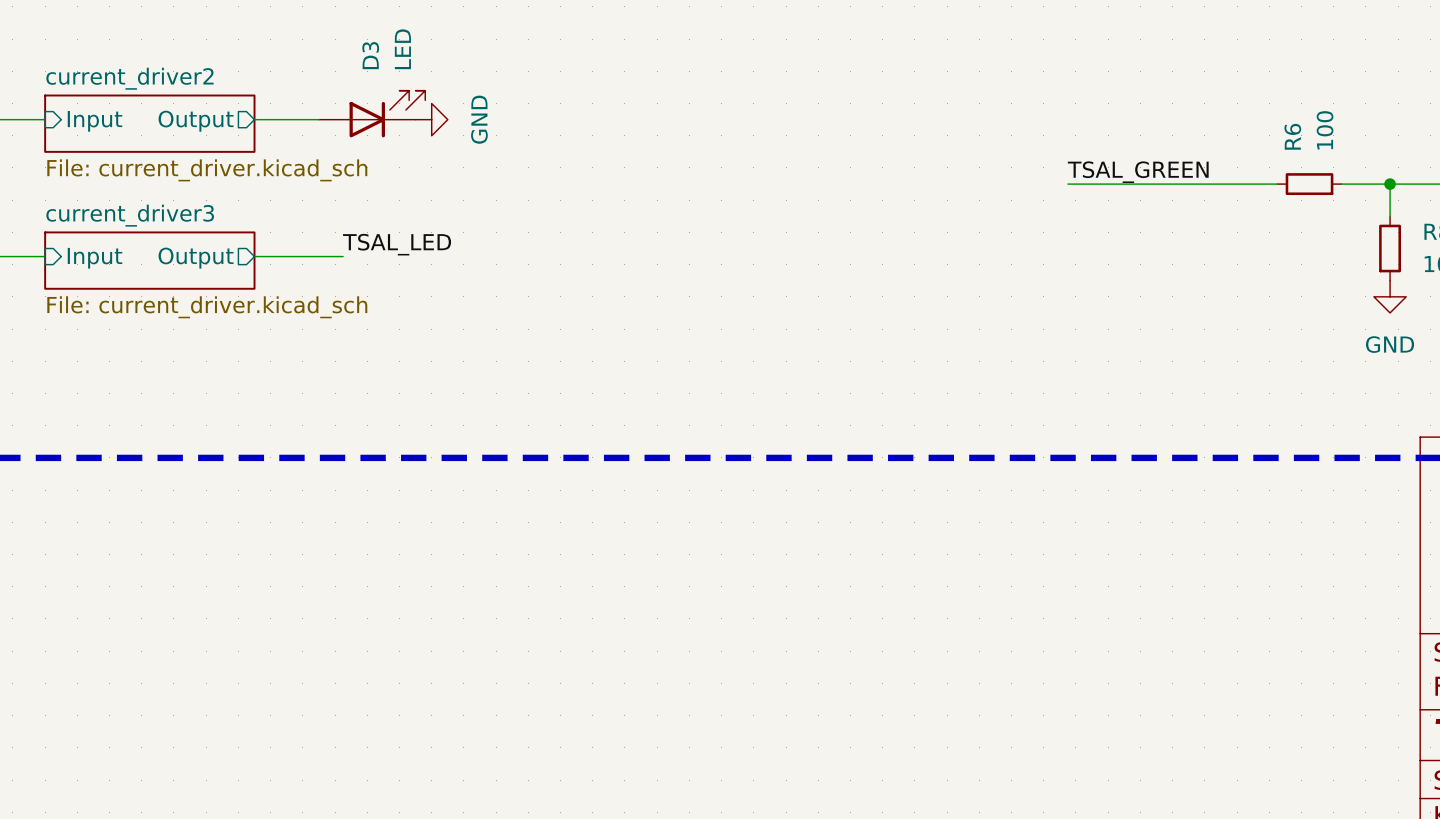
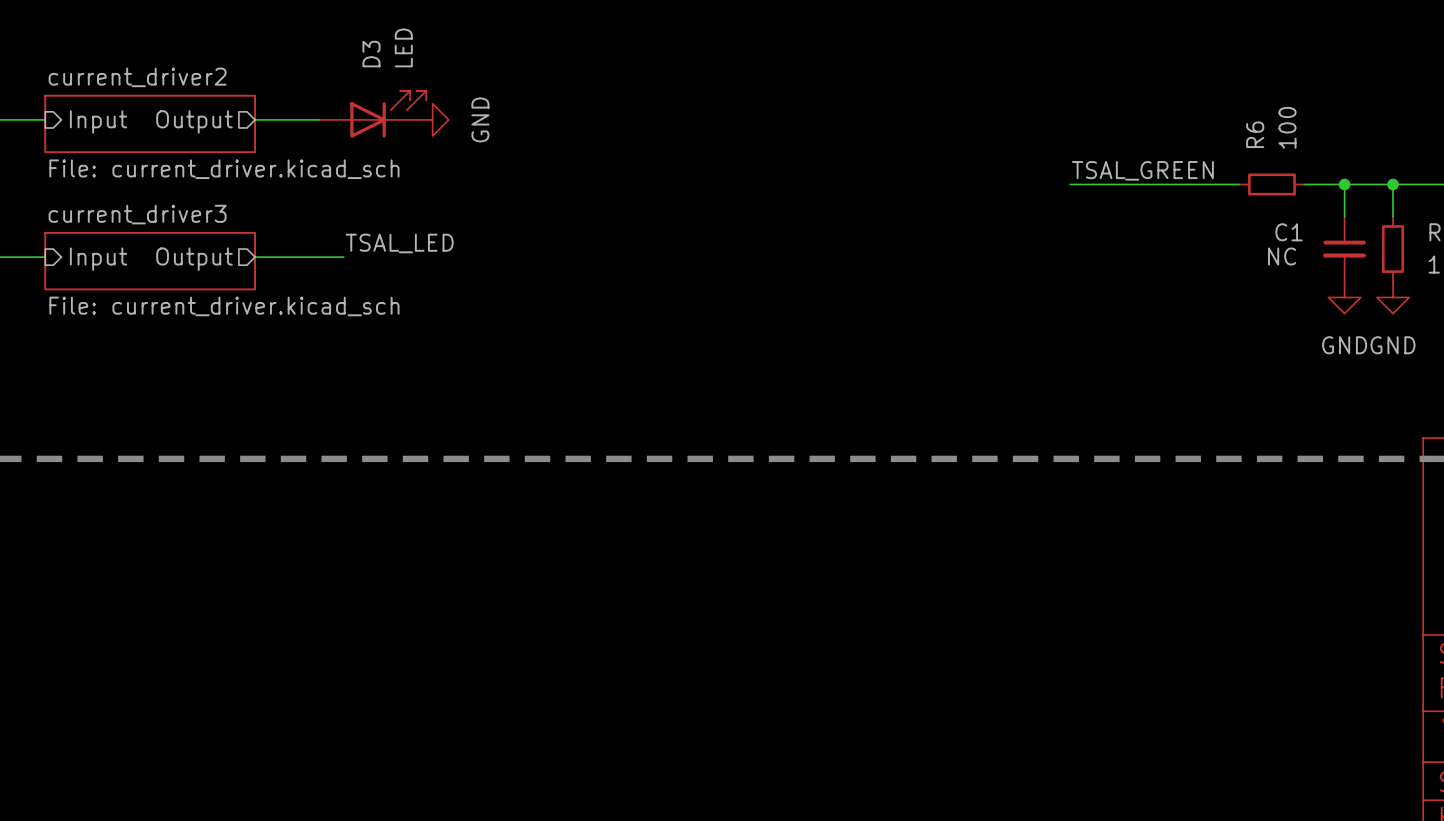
wire: (1237, 184) (1277, 184) -> none
wire: none -> (1304, 184) (1344, 184) (1344, 216)
R6 position: (1309, 184) -> (1271, 184)
junction: none -> (1344, 184)
C1: none -> NC (1344, 249)
power symbol: none -> GND (1344, 297)

